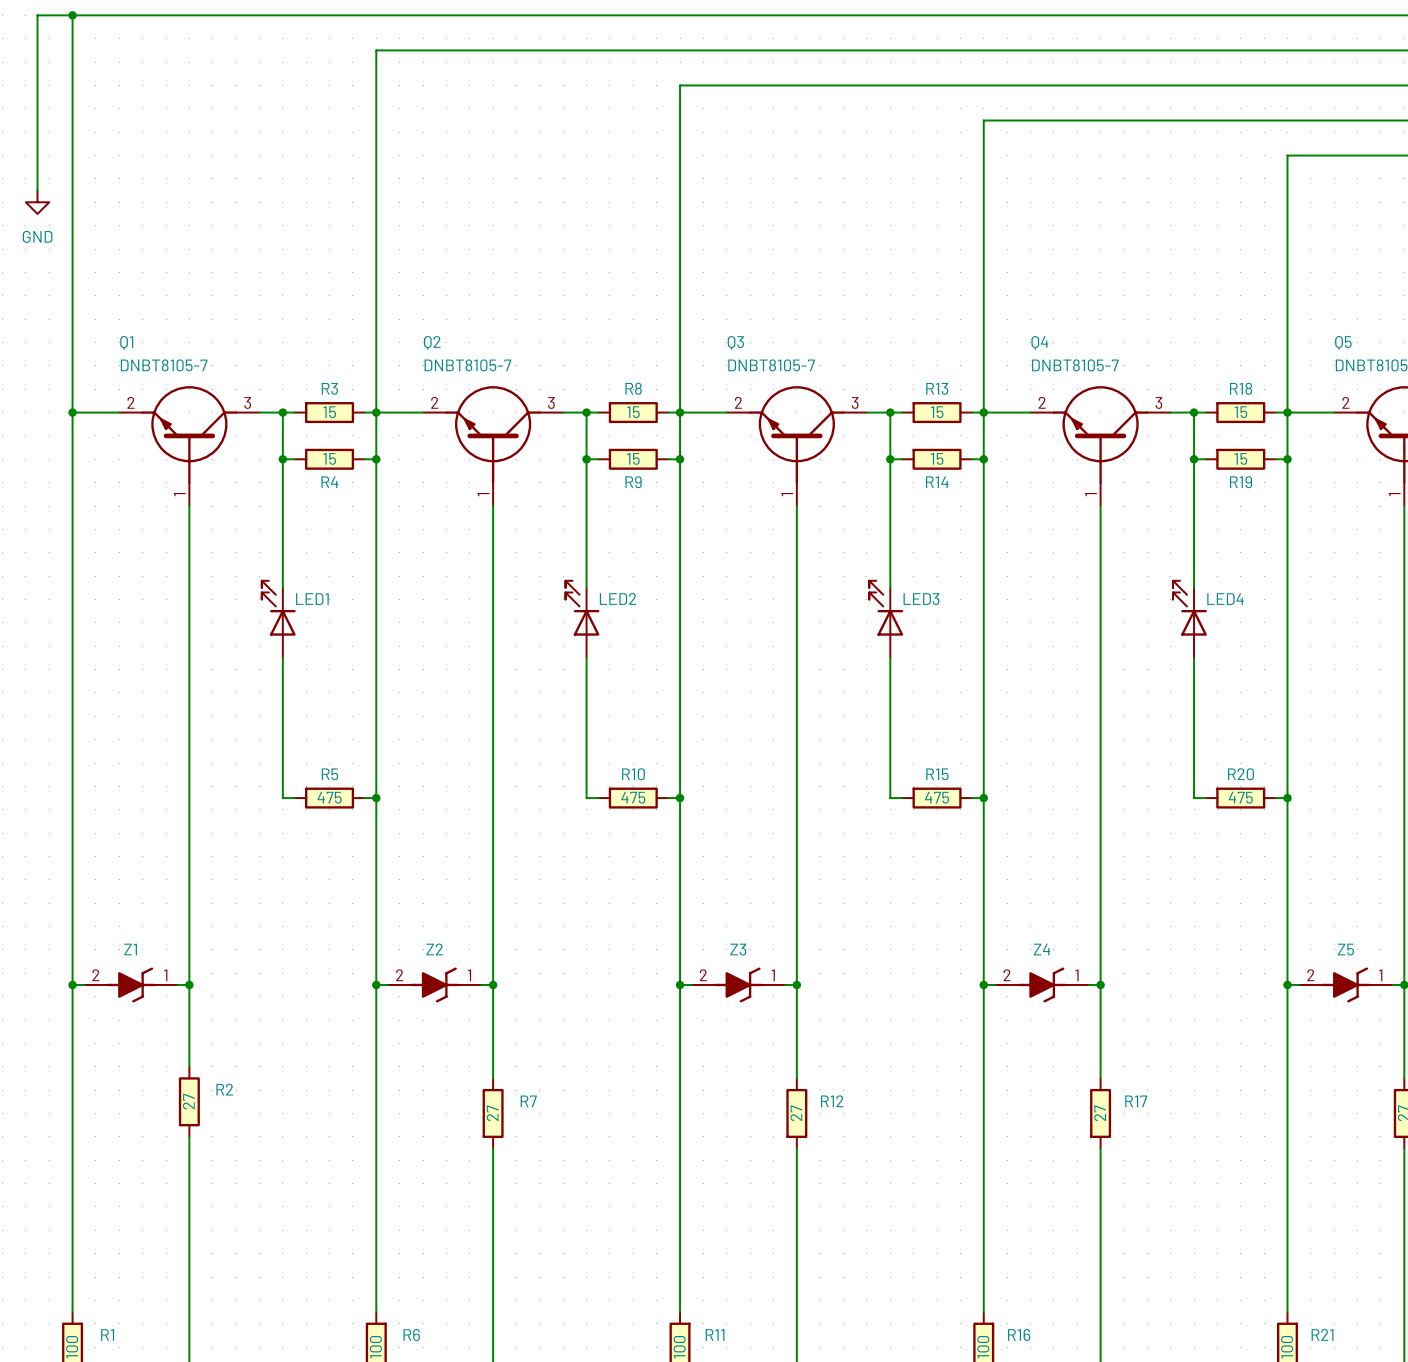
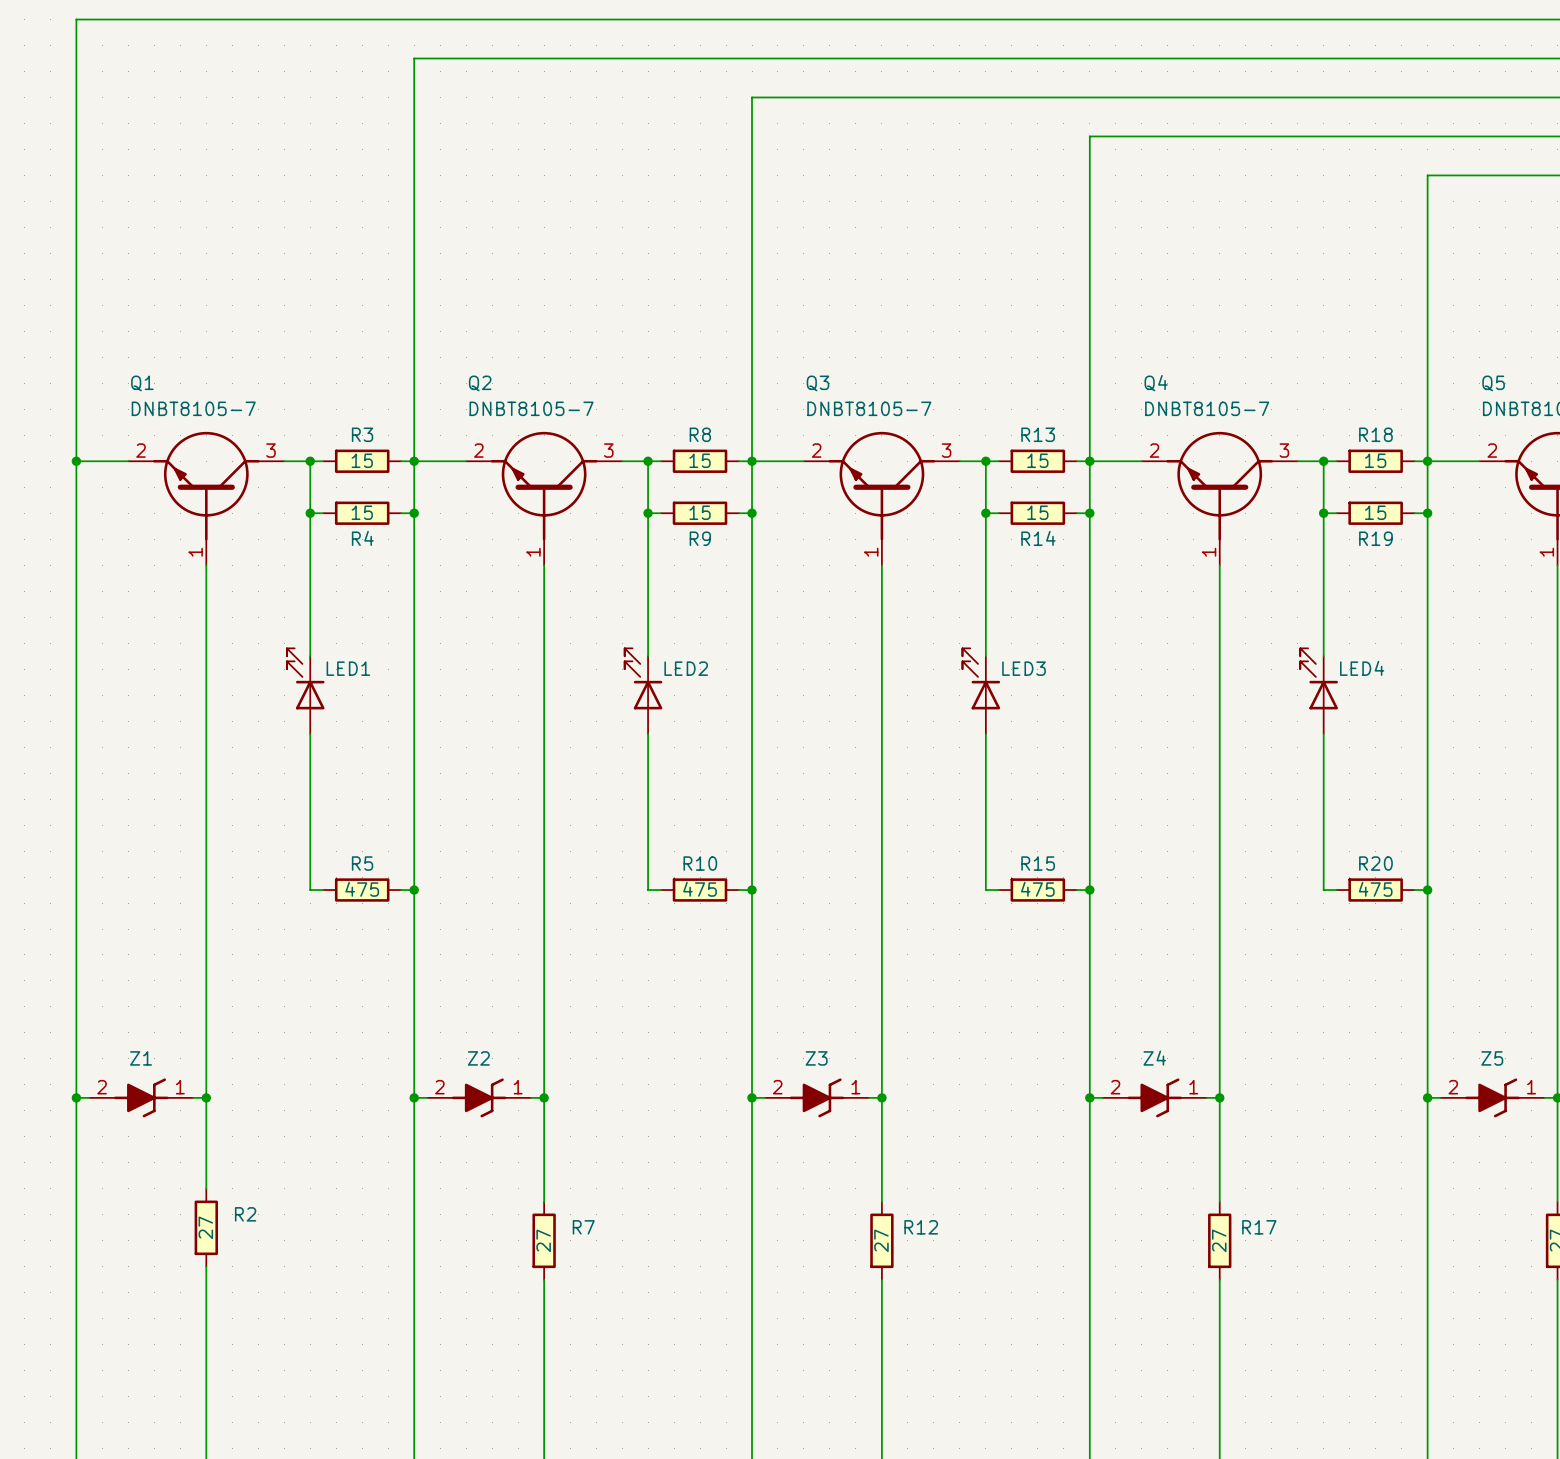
wire: (72, 15) (37, 15) (37, 190) -> none
junction: (72, 15) -> none
power symbol: GND (37, 202) -> none

